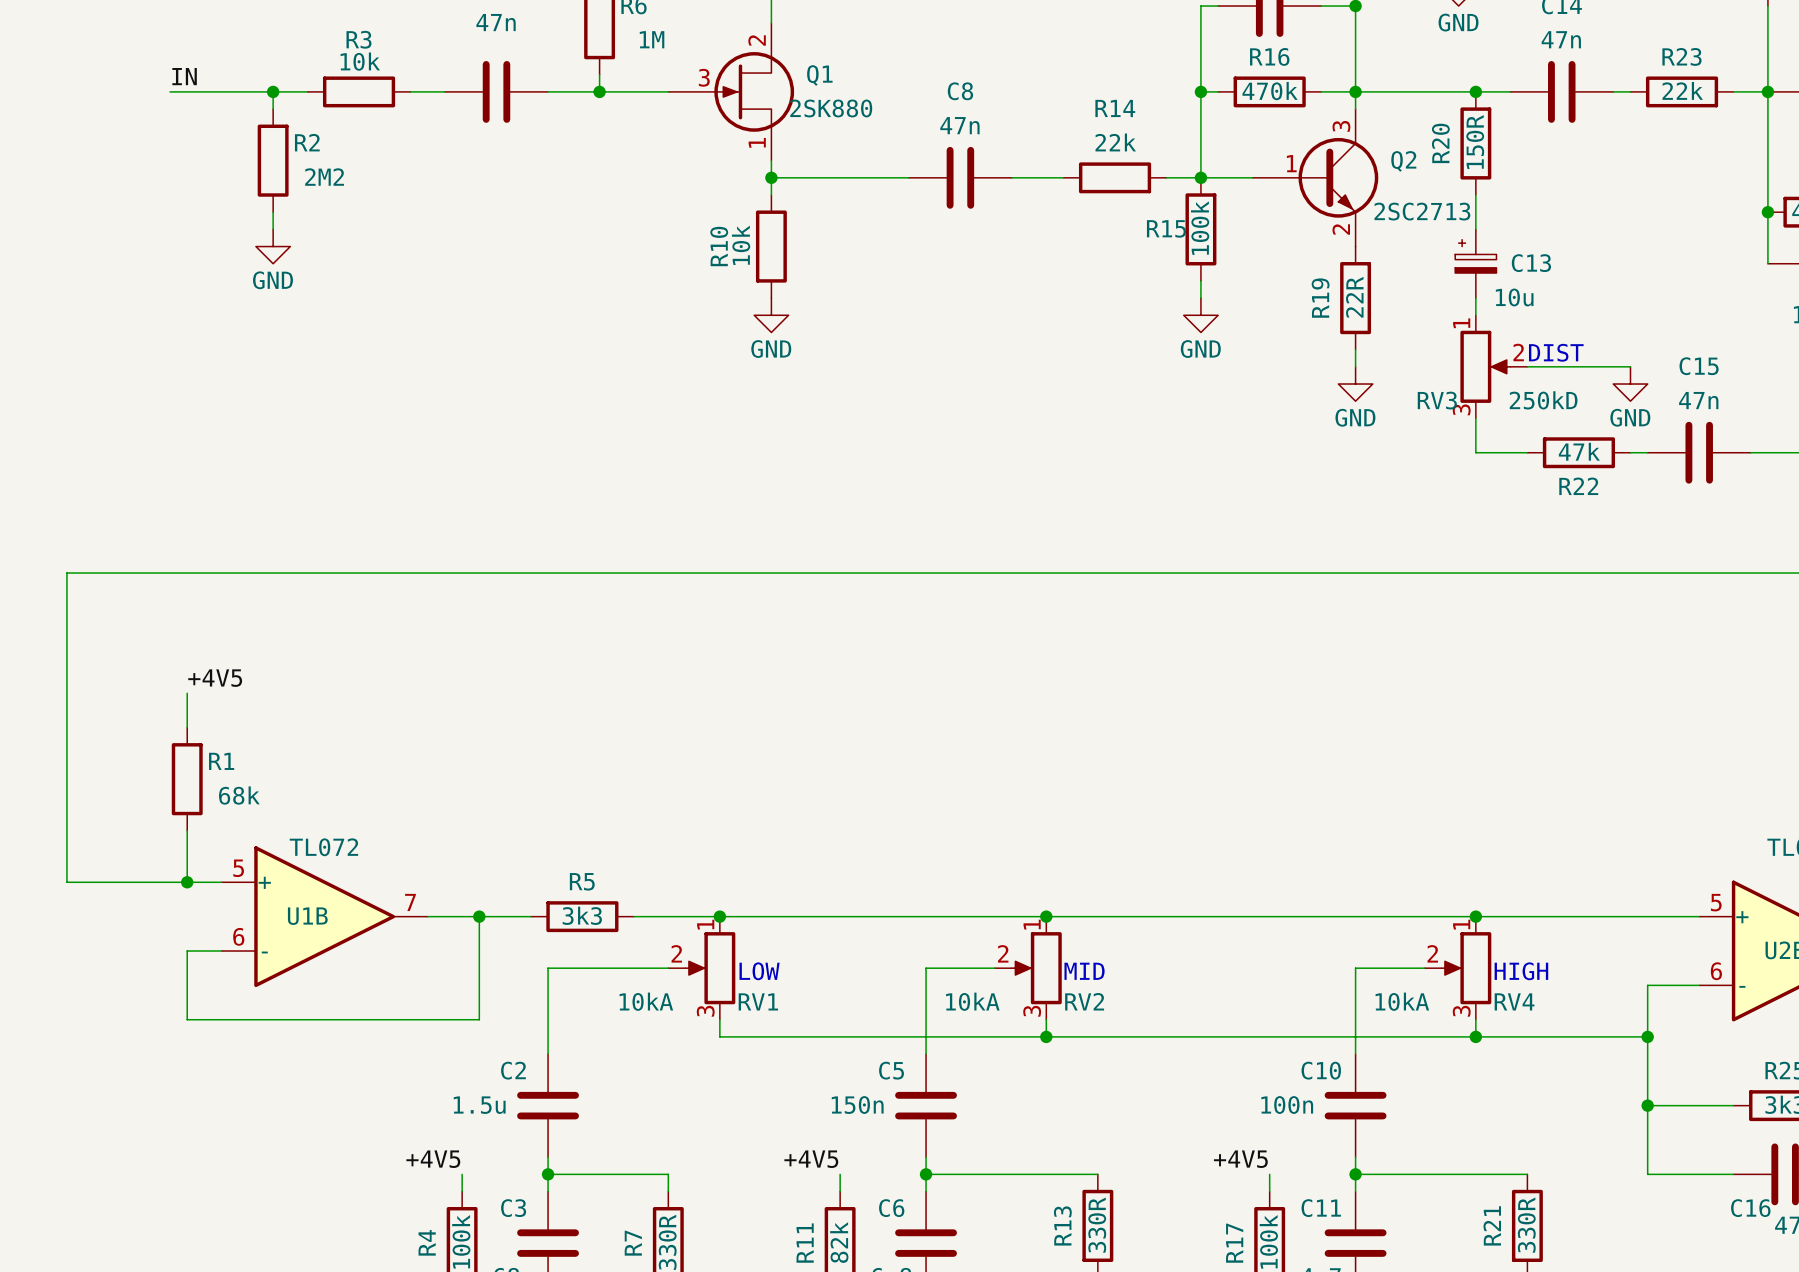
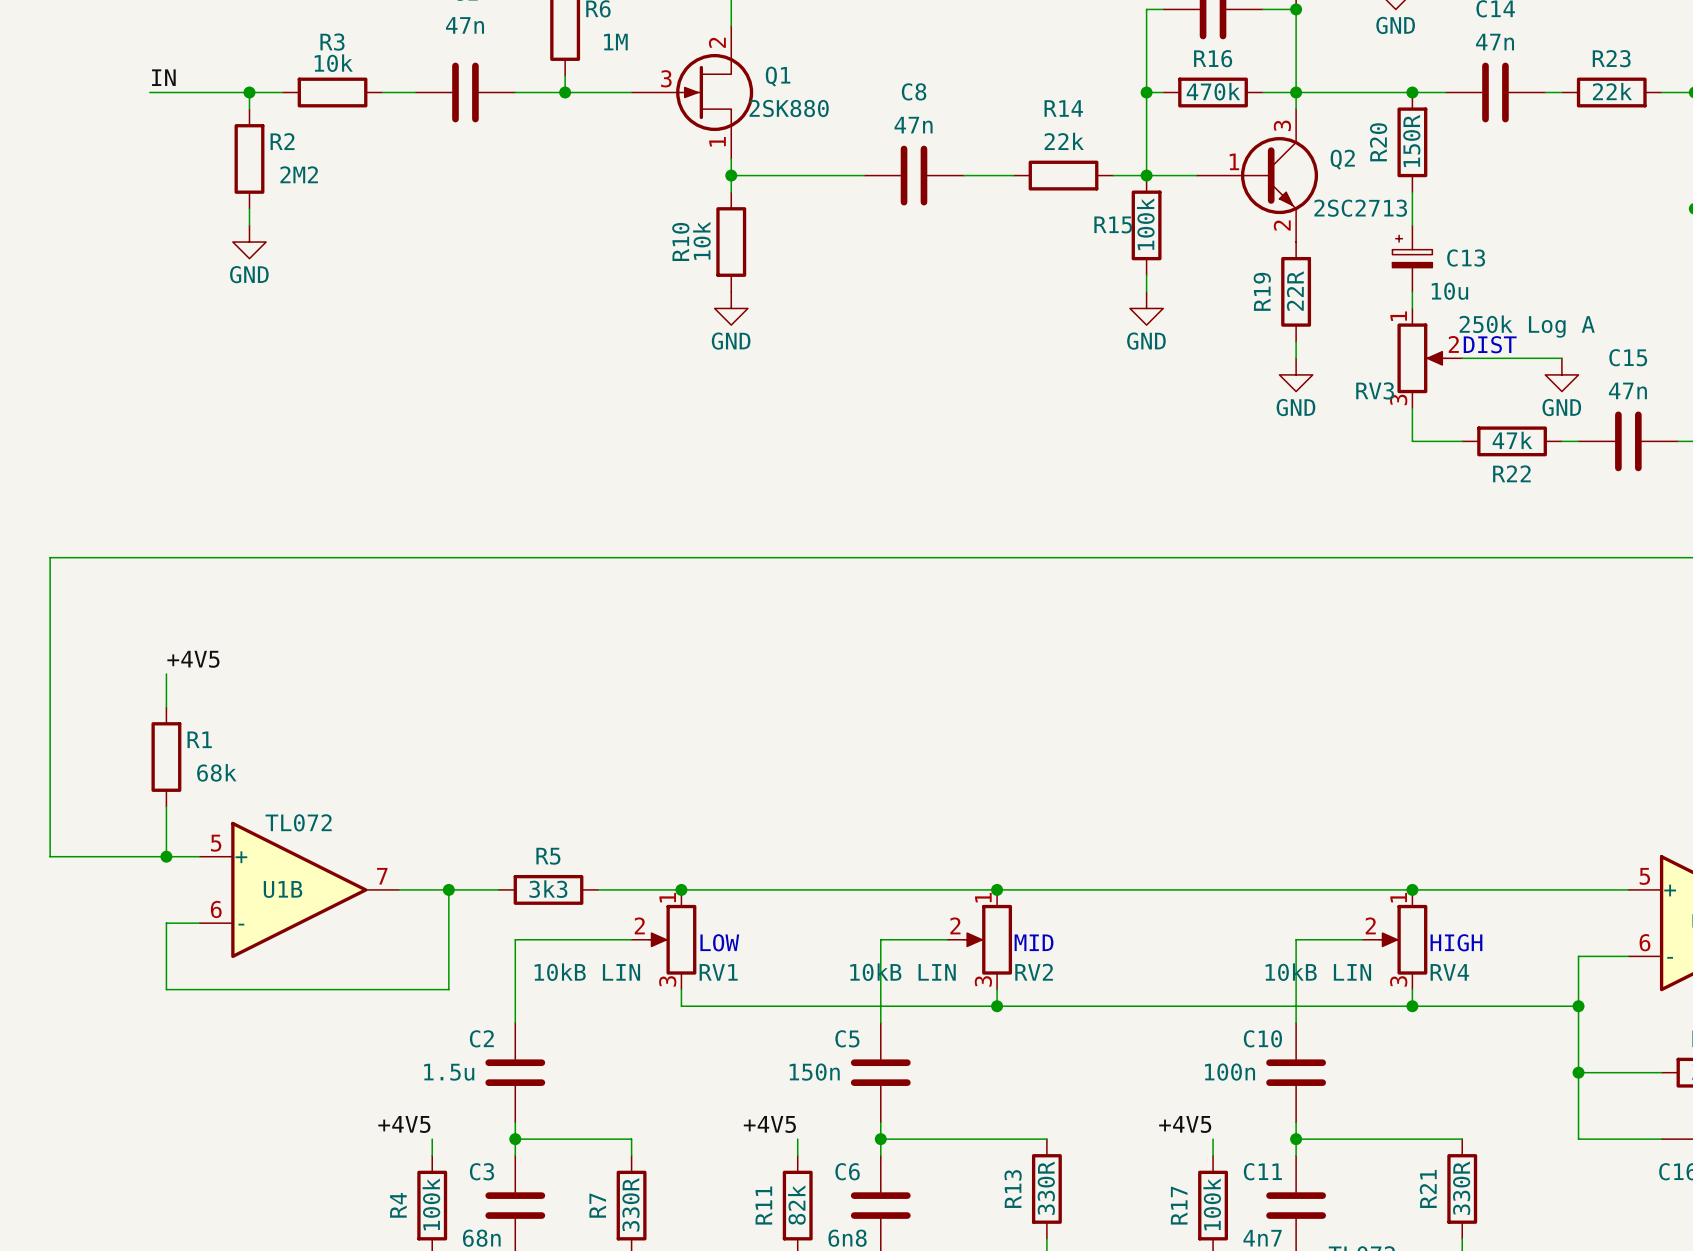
RV3 value: 250kD (1543, 400) -> 250k Log A (1527, 326)
RV1 value: 10kA (646, 1001) -> 10kB LIN (587, 972)
RV2 value: 10kA (972, 1001) -> 10kB LIN (903, 972)
RV4 value: 10kA (1402, 1001) -> 10kB LIN (1318, 972)

